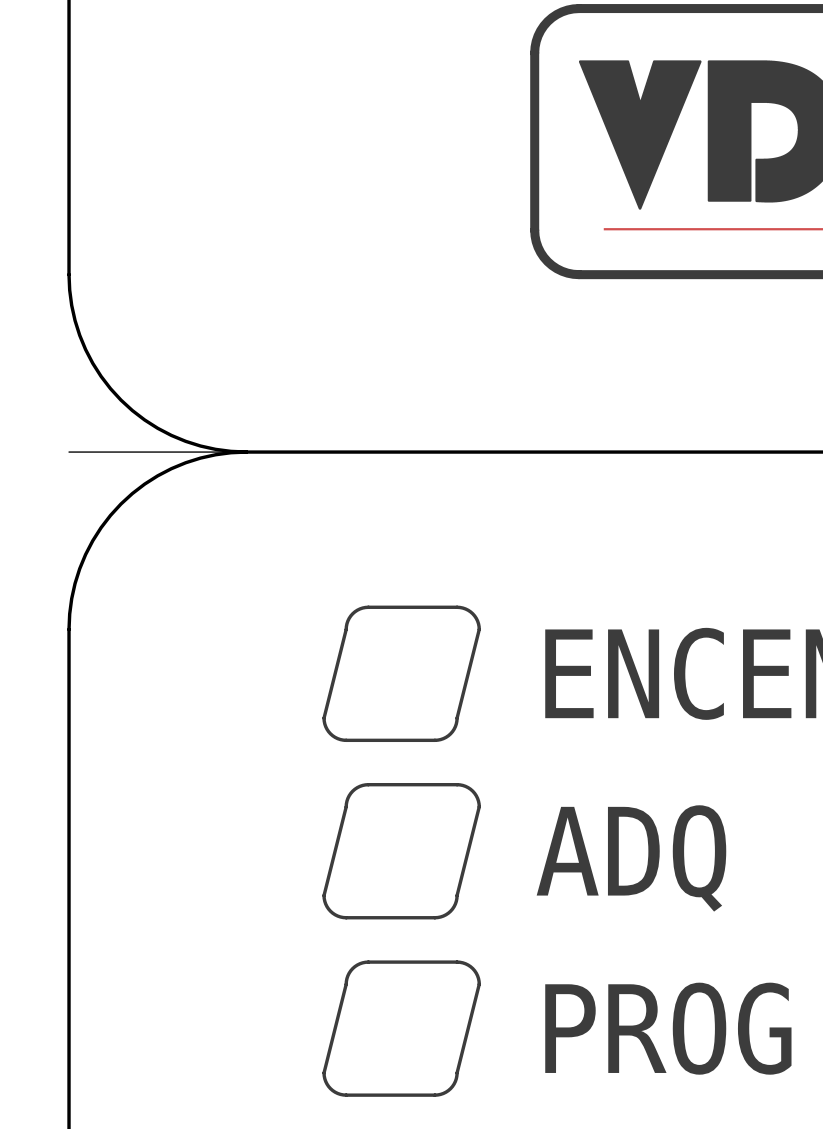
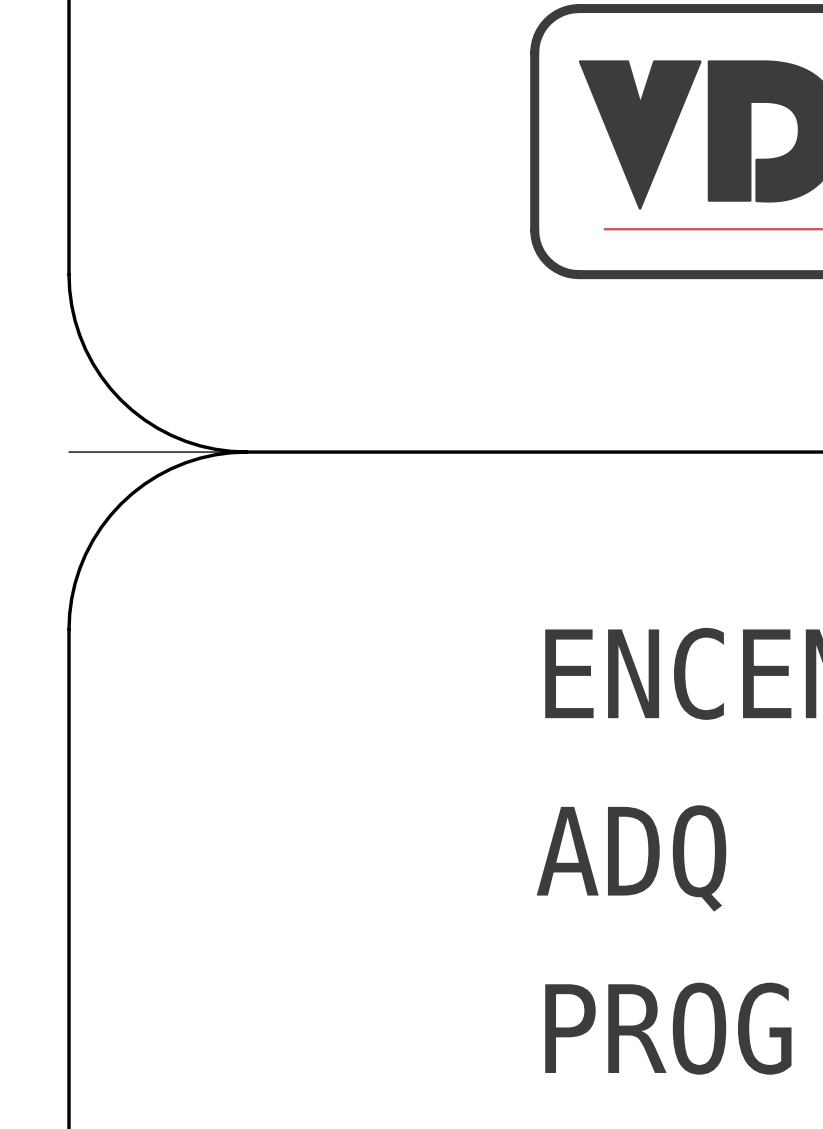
line: (368, 607) (459, 607) (470, 611) (476, 618) (479, 629) (456, 723) (452, 731) (446, 737) (434, 740) (343, 740) (332, 735) (327, 729) (324, 718) (347, 620) (354, 611) (368, 607) -> none
line: (368, 784) (459, 784) (470, 789) (476, 795) (479, 806) (456, 901) (452, 909) (446, 914) (434, 917) (343, 917) (332, 913) (327, 906) (324, 895) (347, 798) (354, 789) (368, 784) -> none
line: (368, 962) (459, 962) (470, 966) (476, 973) (479, 984) (456, 1078) (452, 1086) (446, 1092) (434, 1095) (343, 1094) (332, 1090) (327, 1084) (324, 1072) (347, 975) (354, 966) (368, 962) -> none

